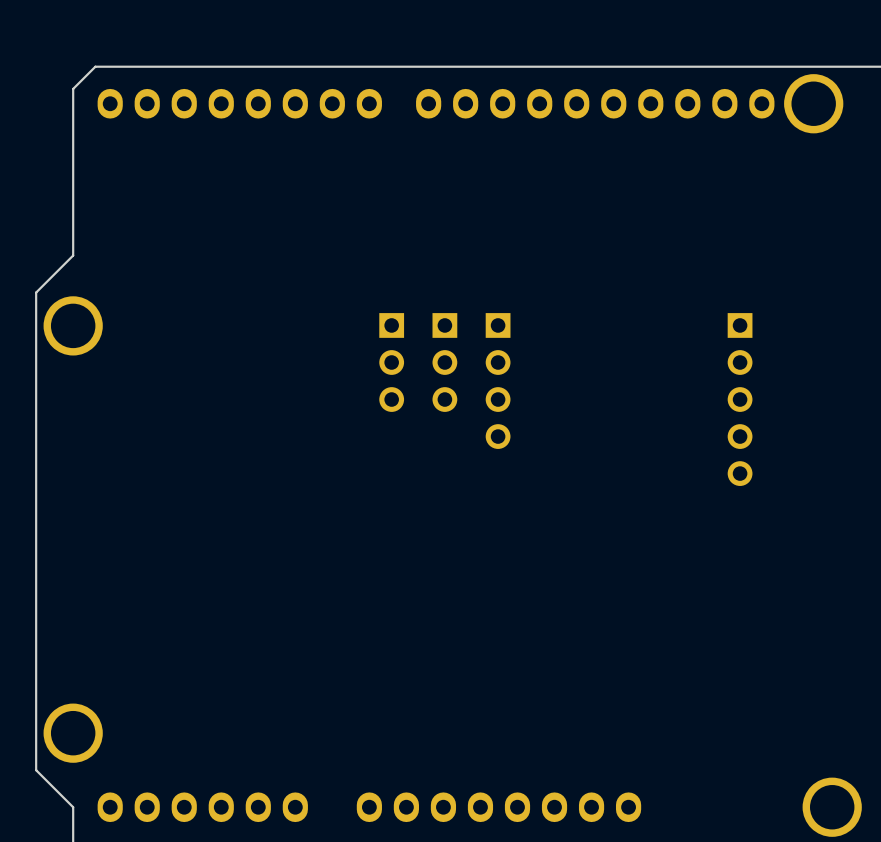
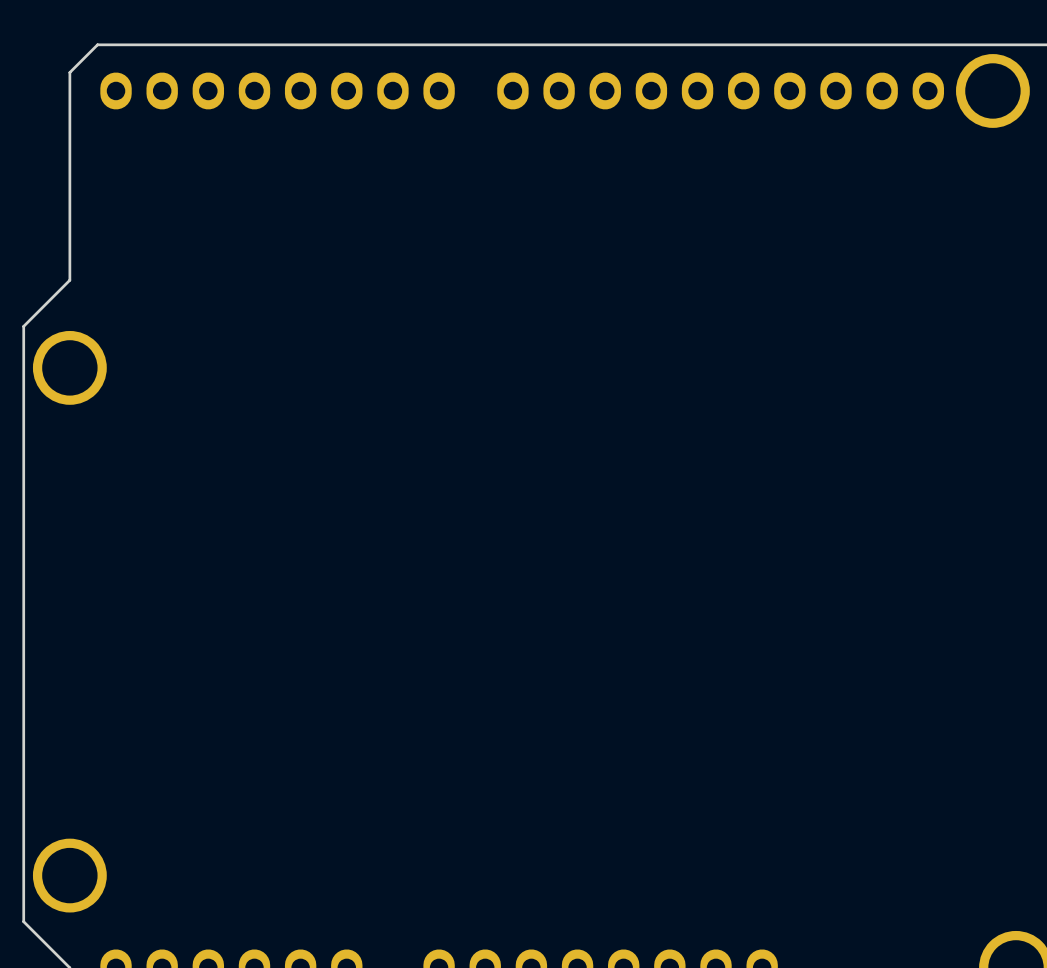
part: (391, 362) -> none
part: (444, 362) -> none
part: (498, 381) -> none
part: (740, 399) -> none

